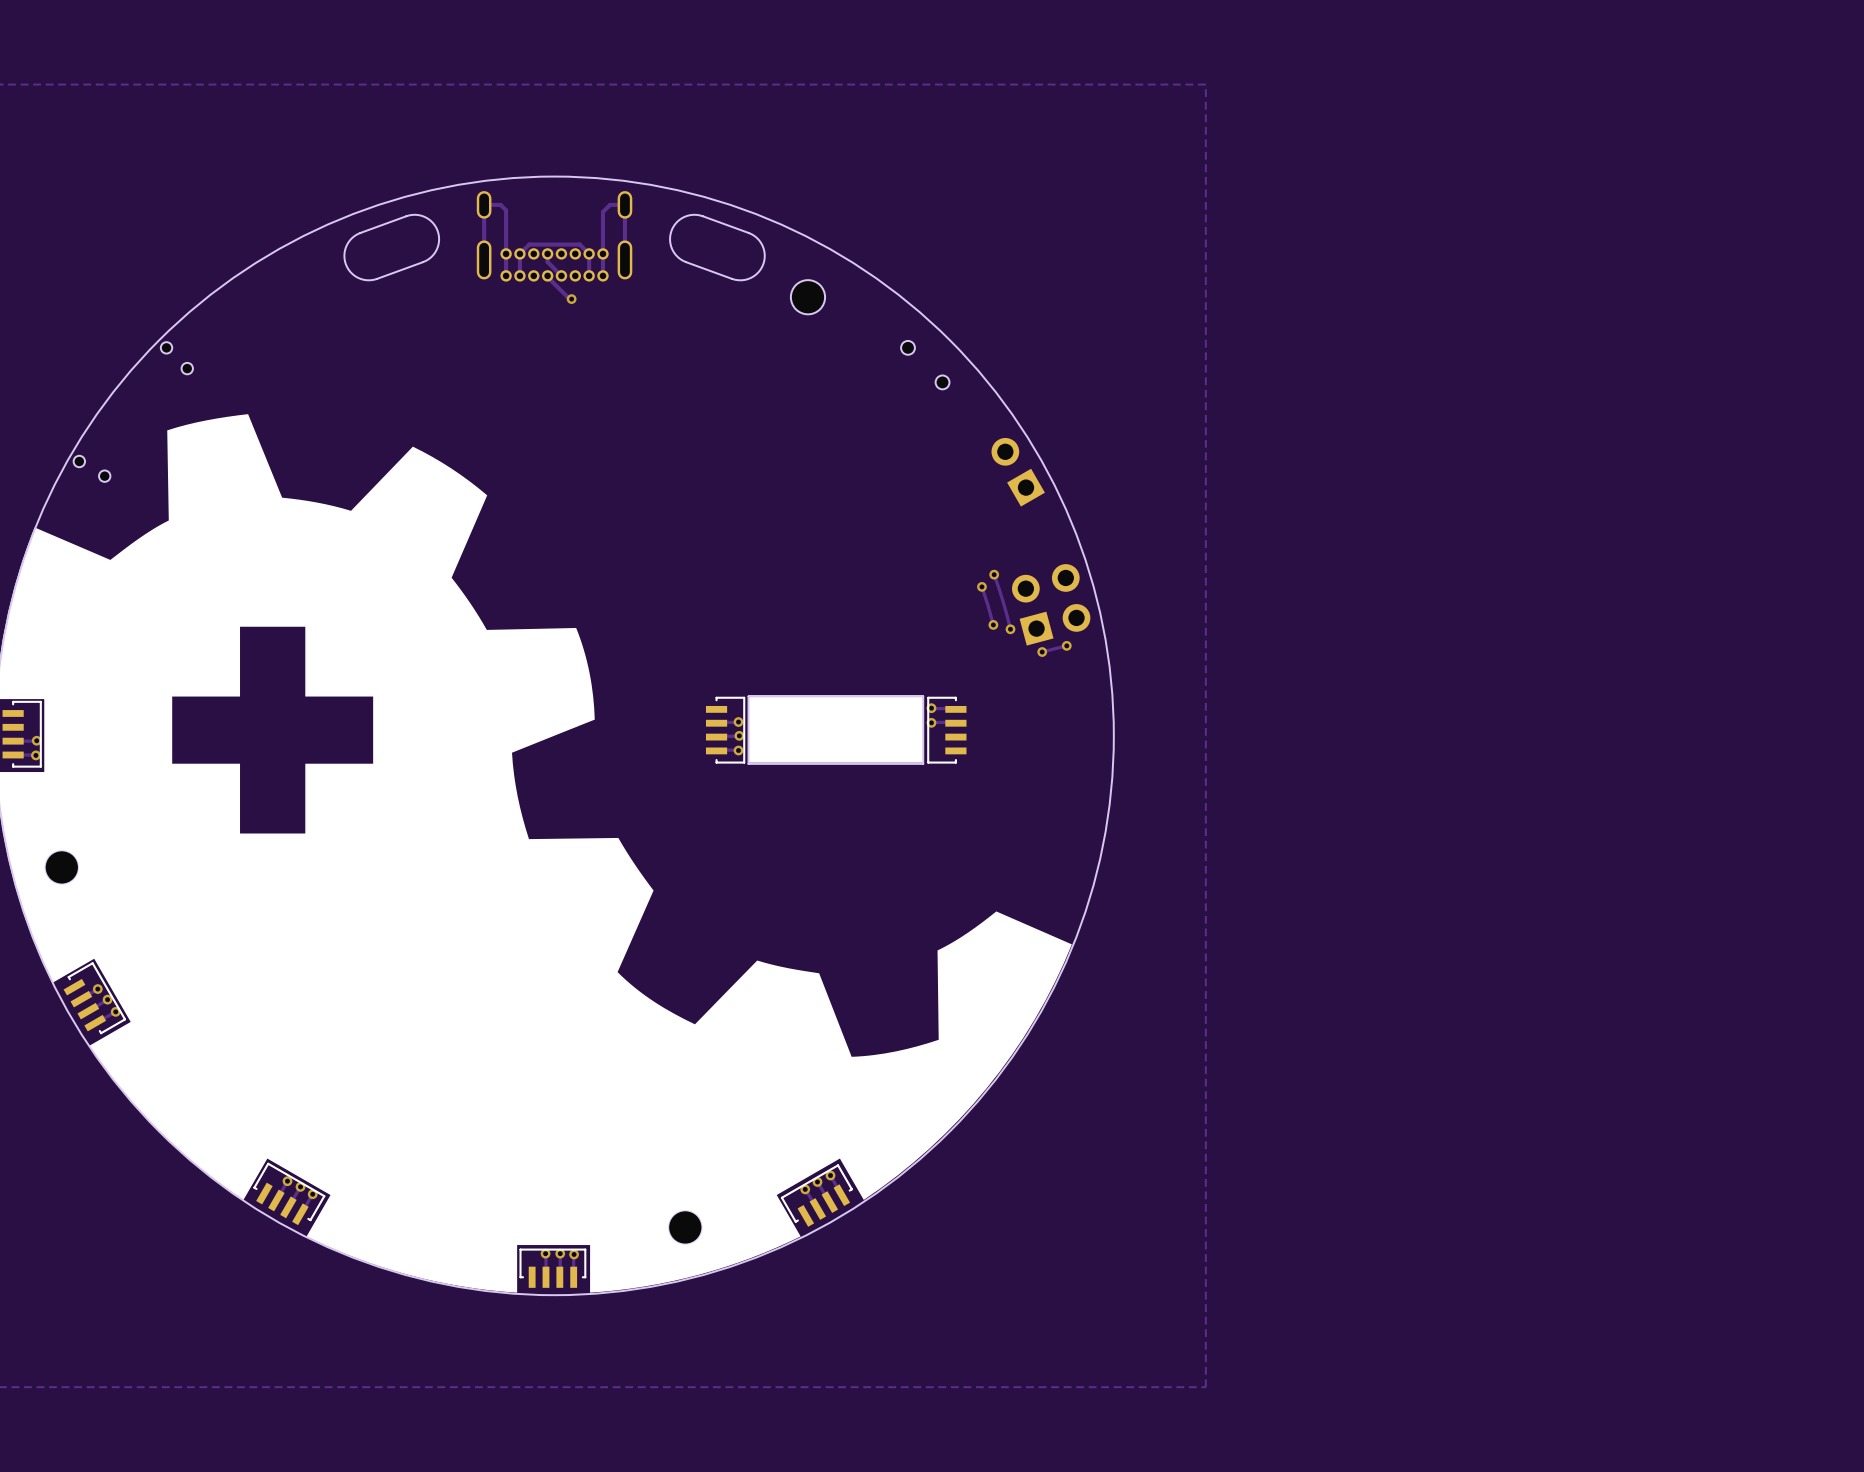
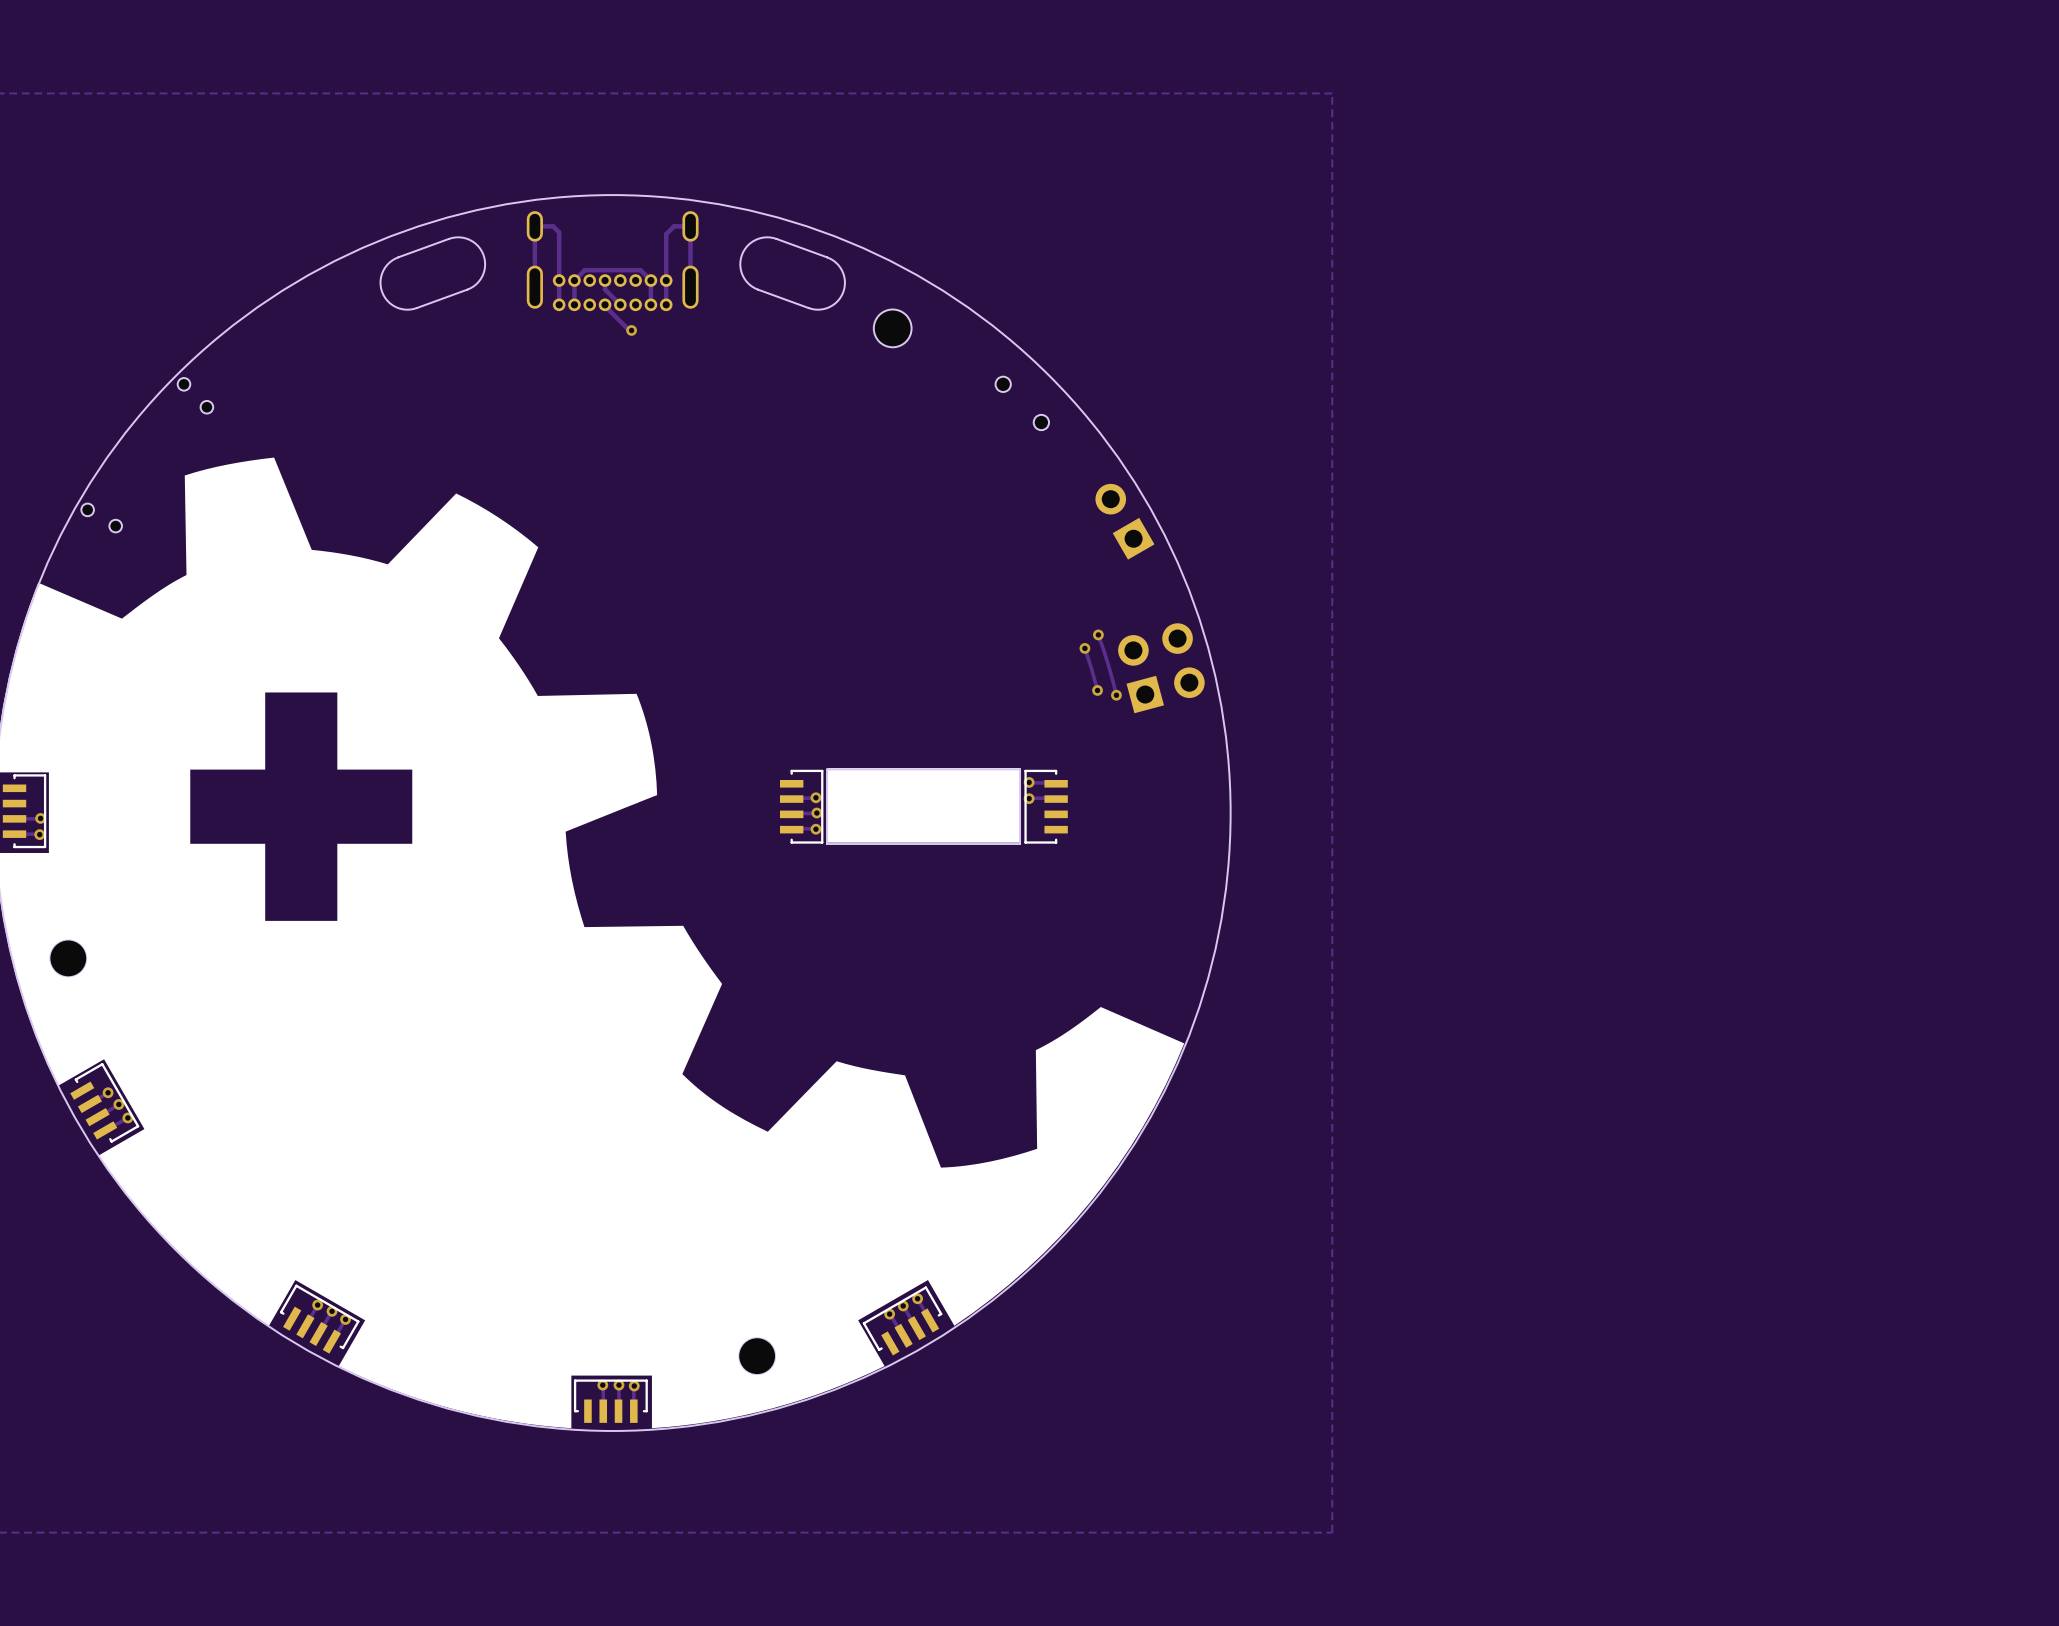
via: (1066, 645) -> none
track: (1067, 645) (1042, 652) -> none
via: (1042, 652) -> none

